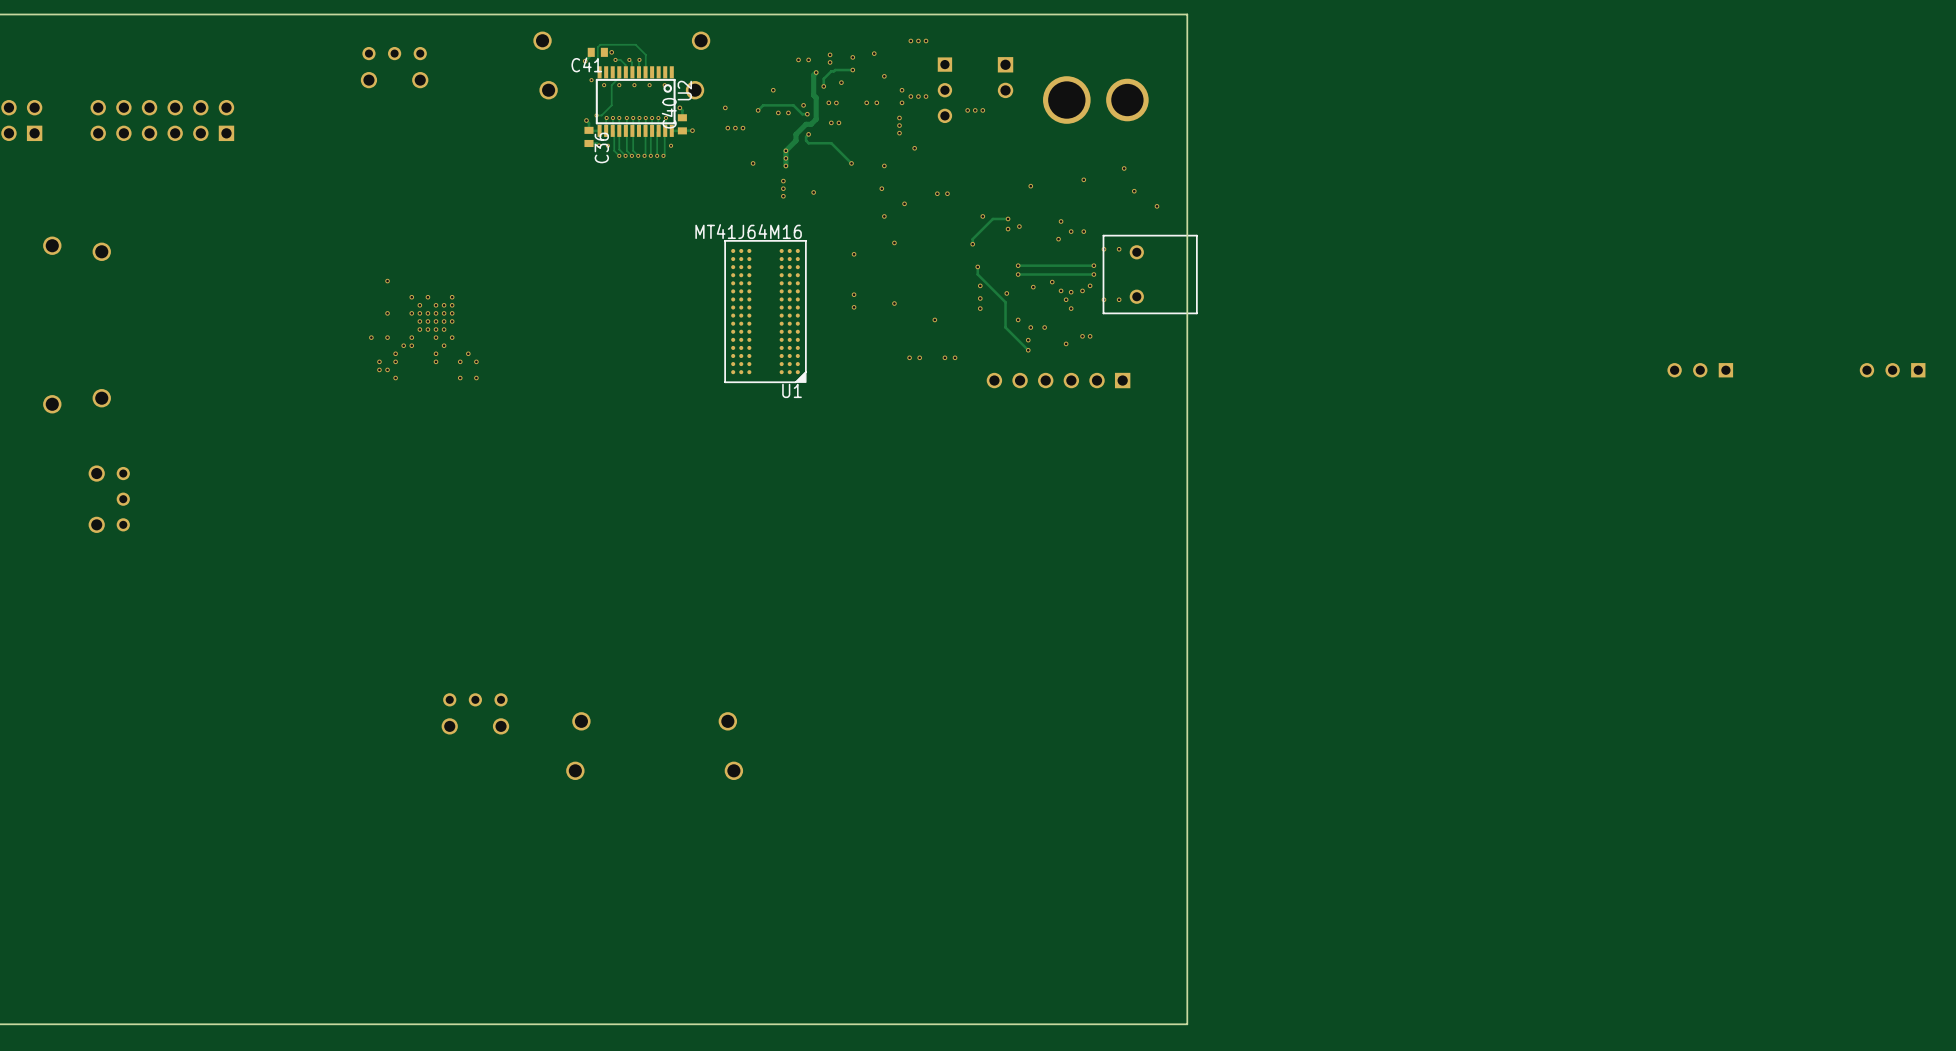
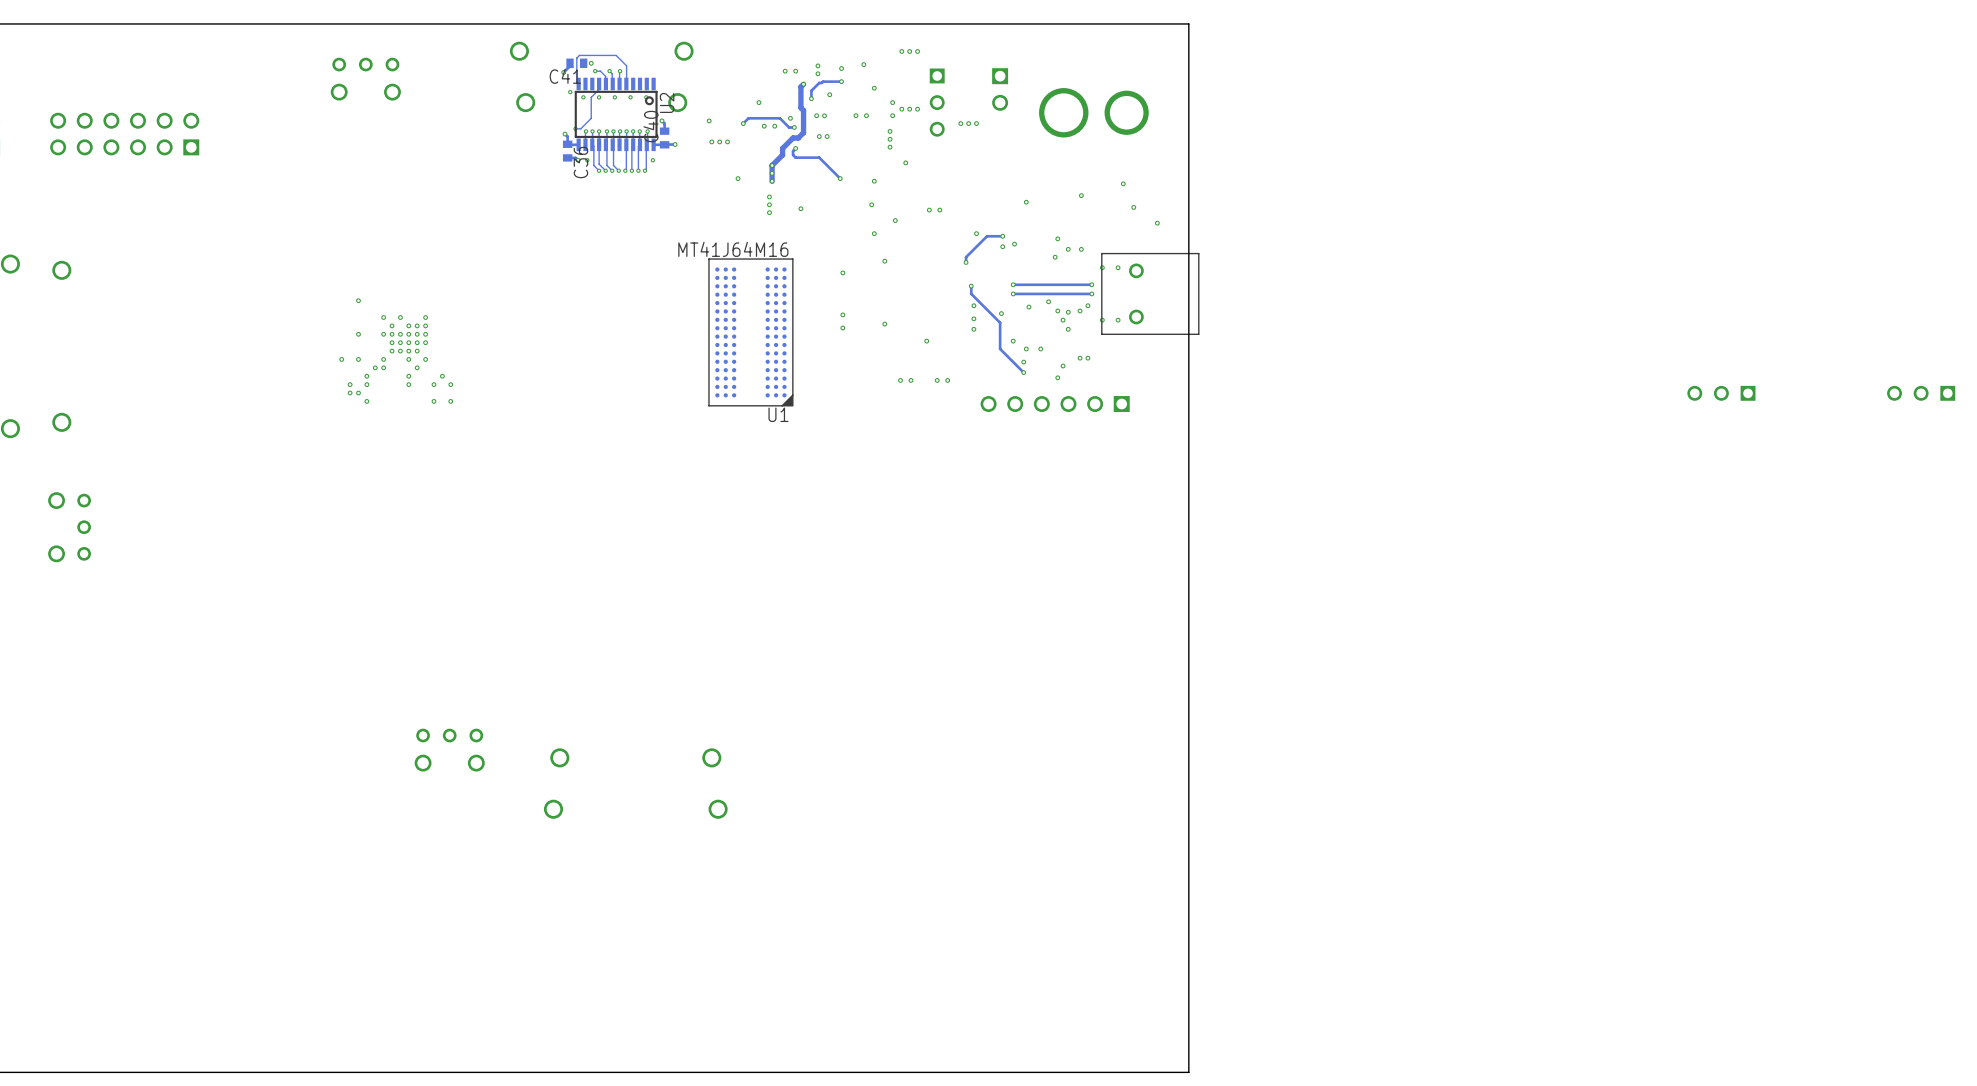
via: none -> (1057, 377)

